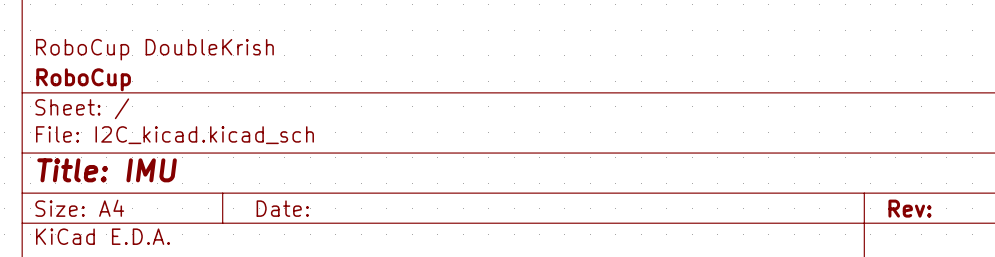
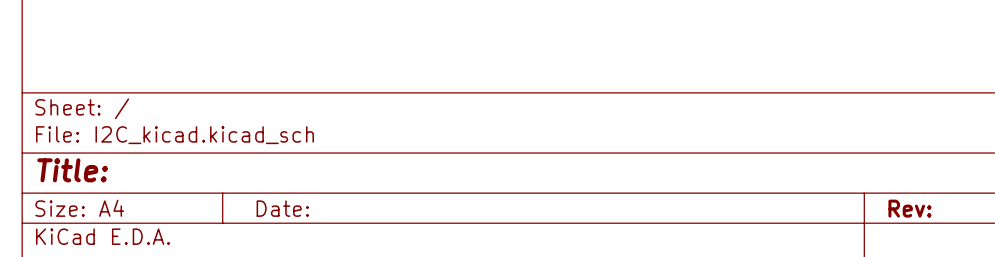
title block: RoboCup DoubleKrish (154, 49) -> none
title block: RoboCup (83, 79) -> none
title block: Title: IMU (107, 170) -> Title: (72, 170)

